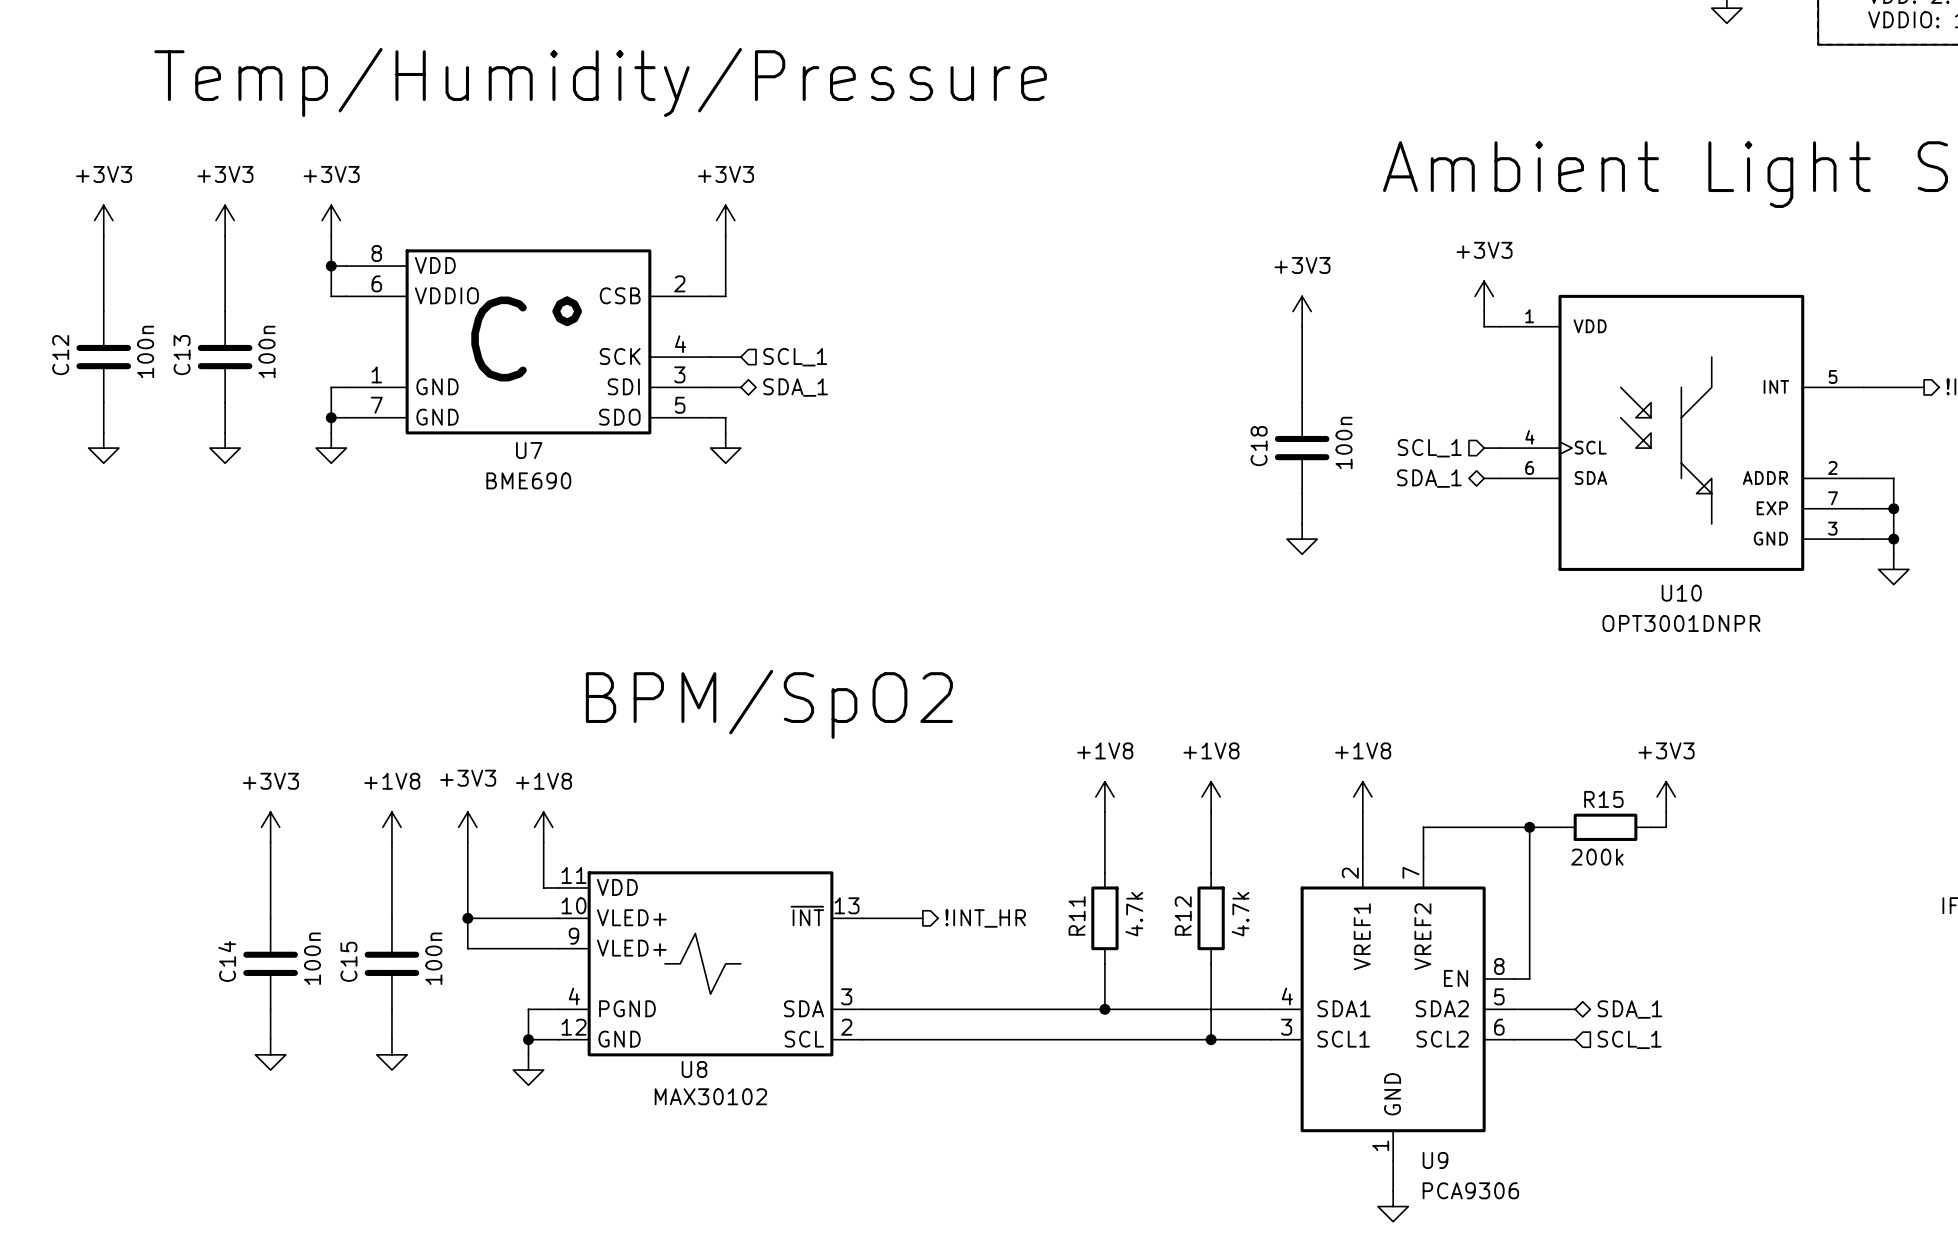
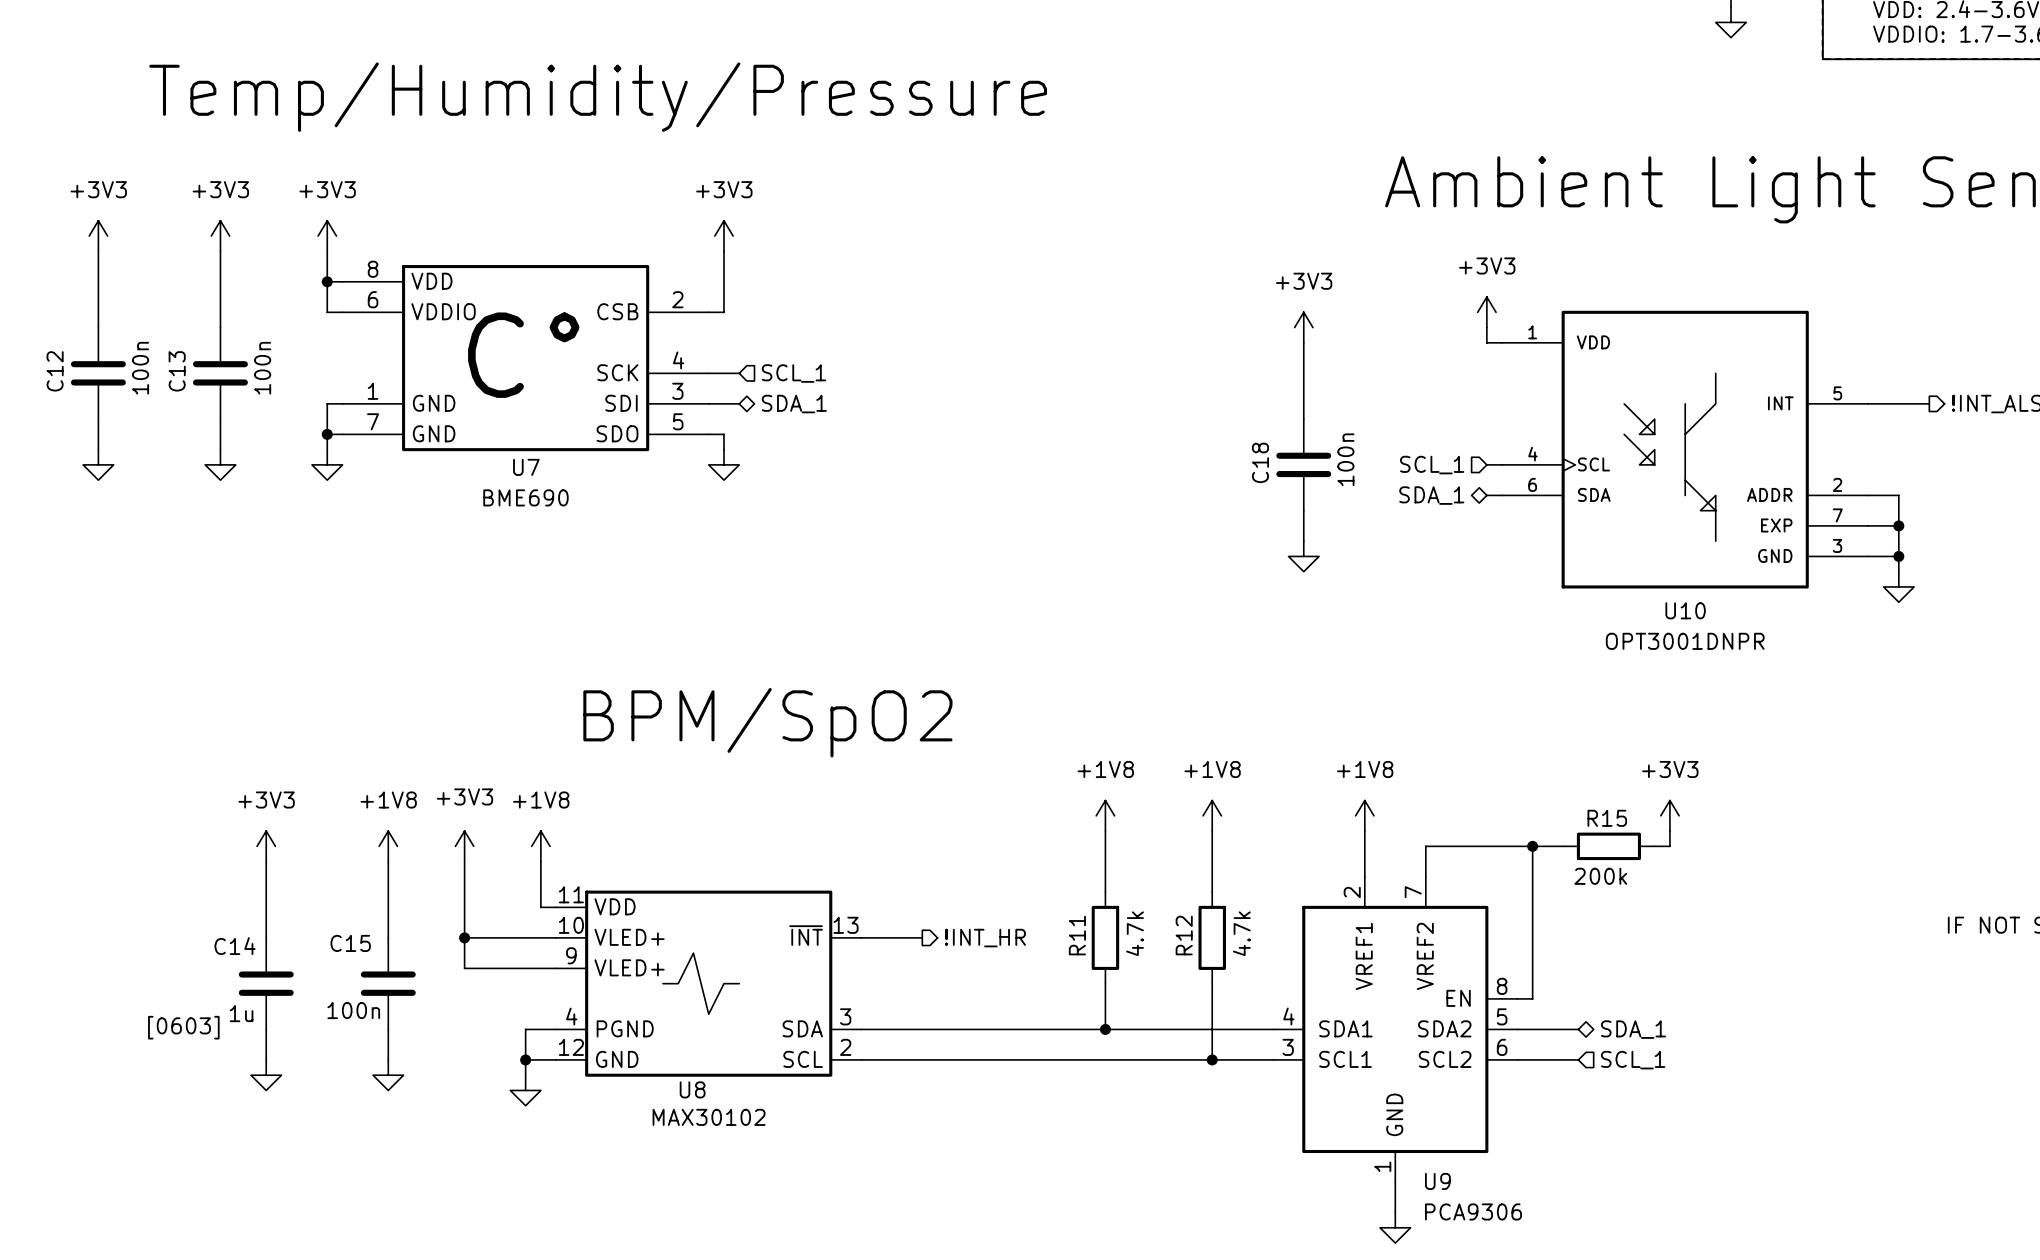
C14 value: 100n (312, 958) -> 1u (241, 1013)
C15 value rotation: 0° (433, 958) -> 90° clockwise (353, 1010)
C15 value position: 100n (433, 958) -> 100n (353, 1010)
C14 name rotation: 0° (227, 961) -> 90° clockwise (235, 946)
C15 name rotation: 0° (348, 961) -> 90° clockwise (350, 943)
text: none -> [0603] (183, 1027)

